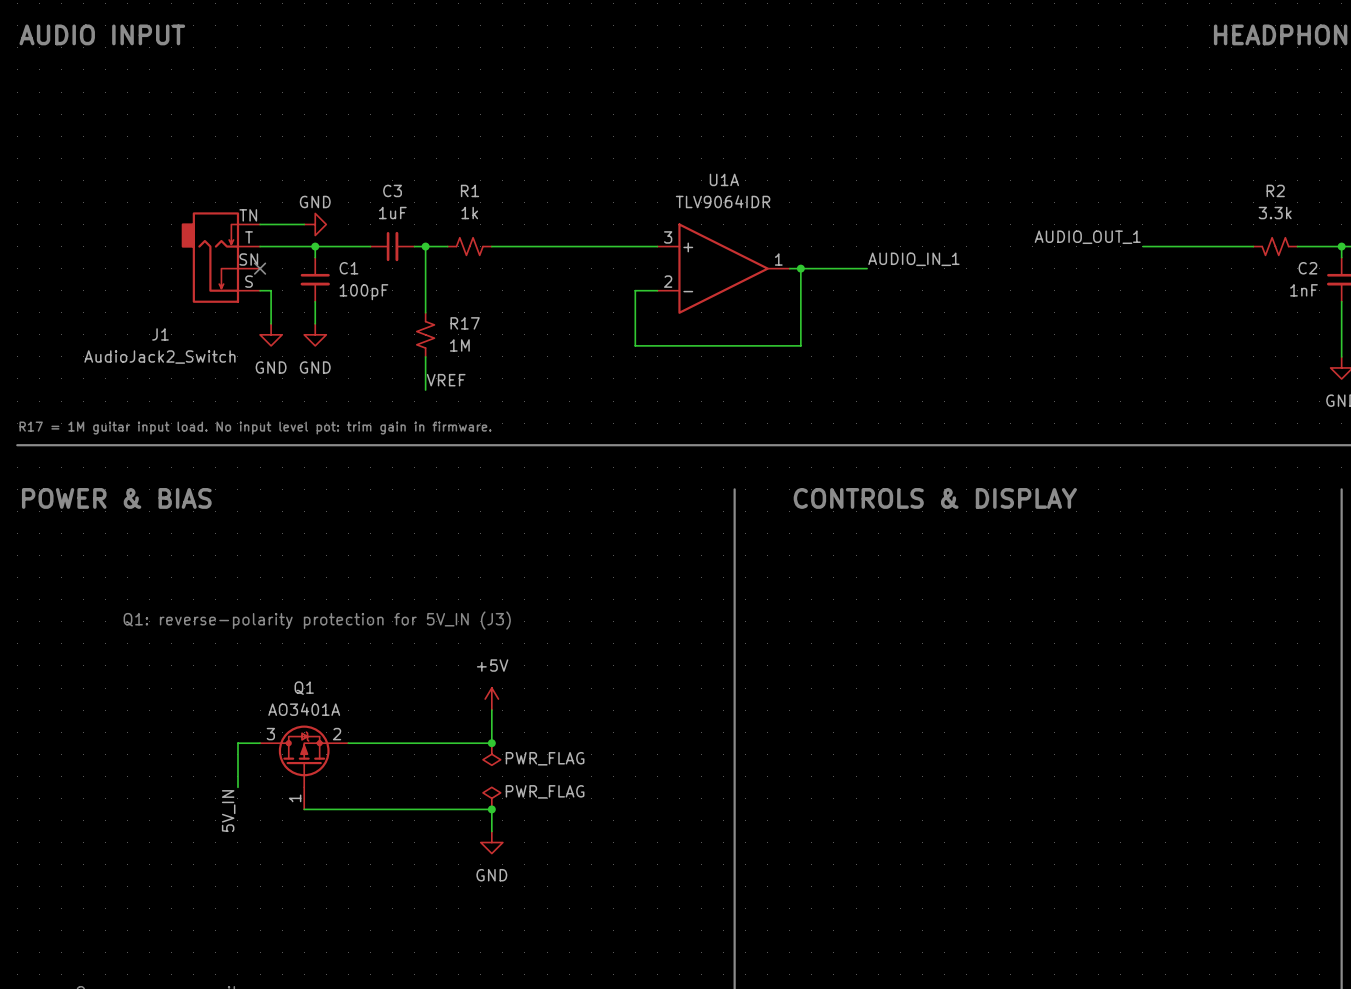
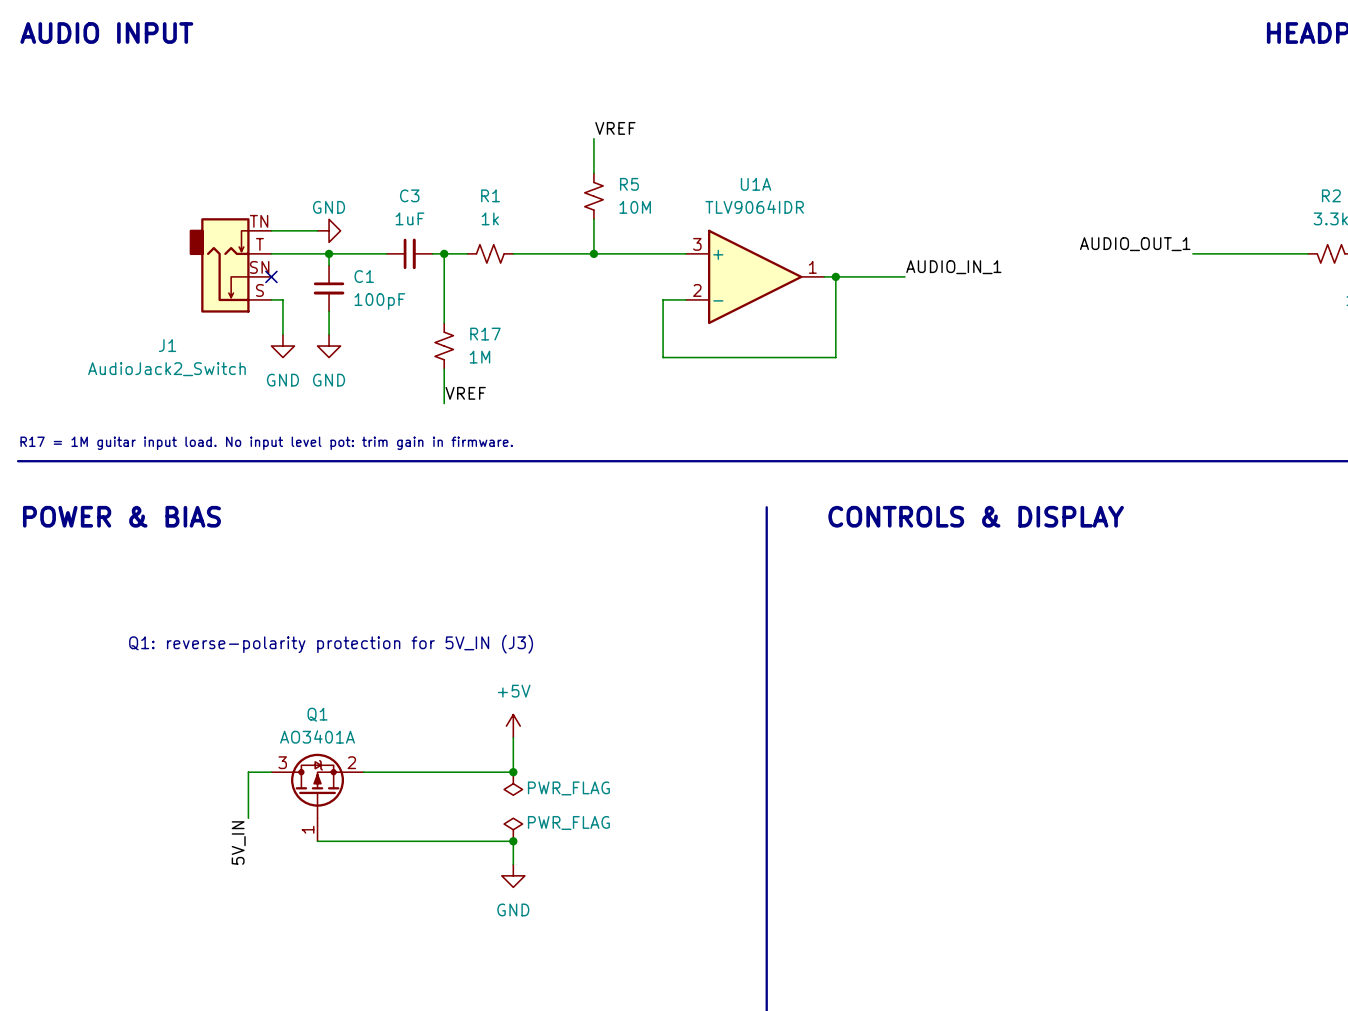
label: none -> VREF (615, 128)
wire: none -> (593, 138) (593, 173)
R5: none -> 10M (593, 196)
wire: none -> (593, 219) (593, 253)
junction: none -> (593, 253)

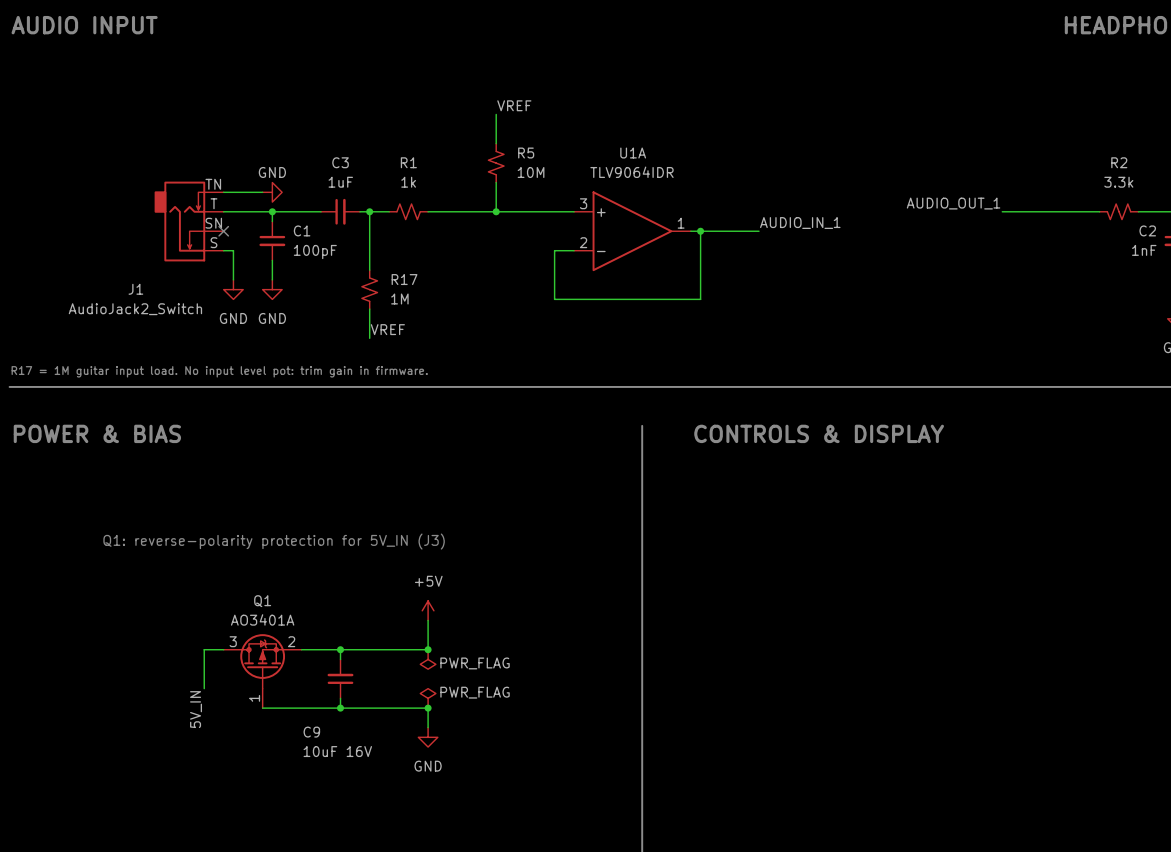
wire: none -> (340, 649) (340, 659)
junction: none -> (340, 649)
C9: none -> 10uF 16V (340, 678)
wire: none -> (340, 698) (340, 708)
junction: none -> (340, 708)

